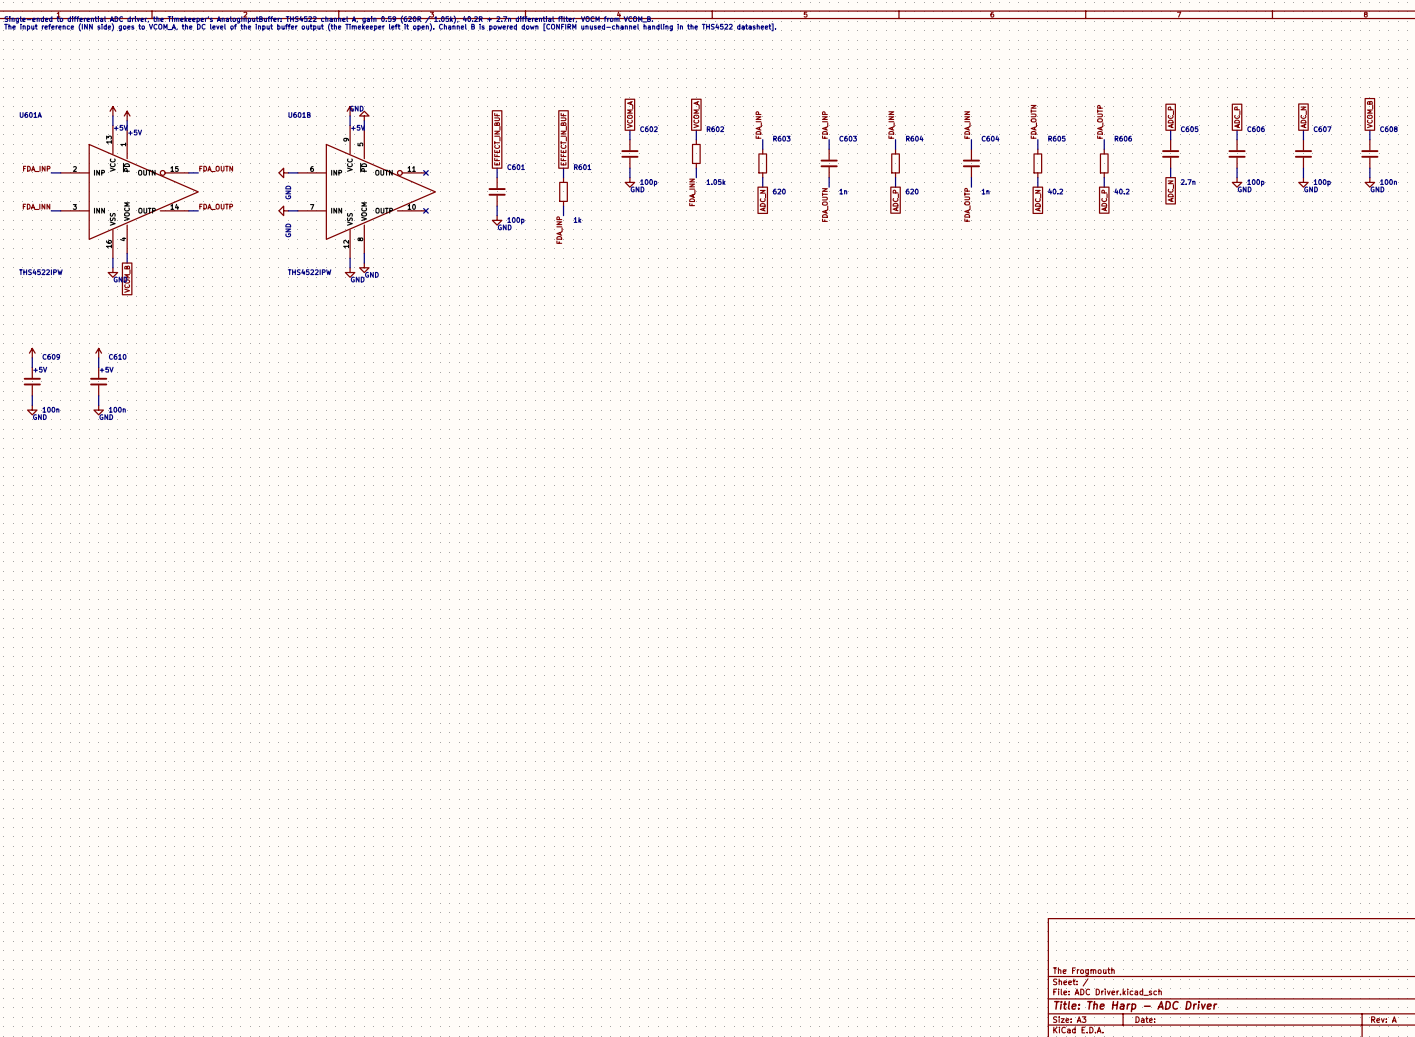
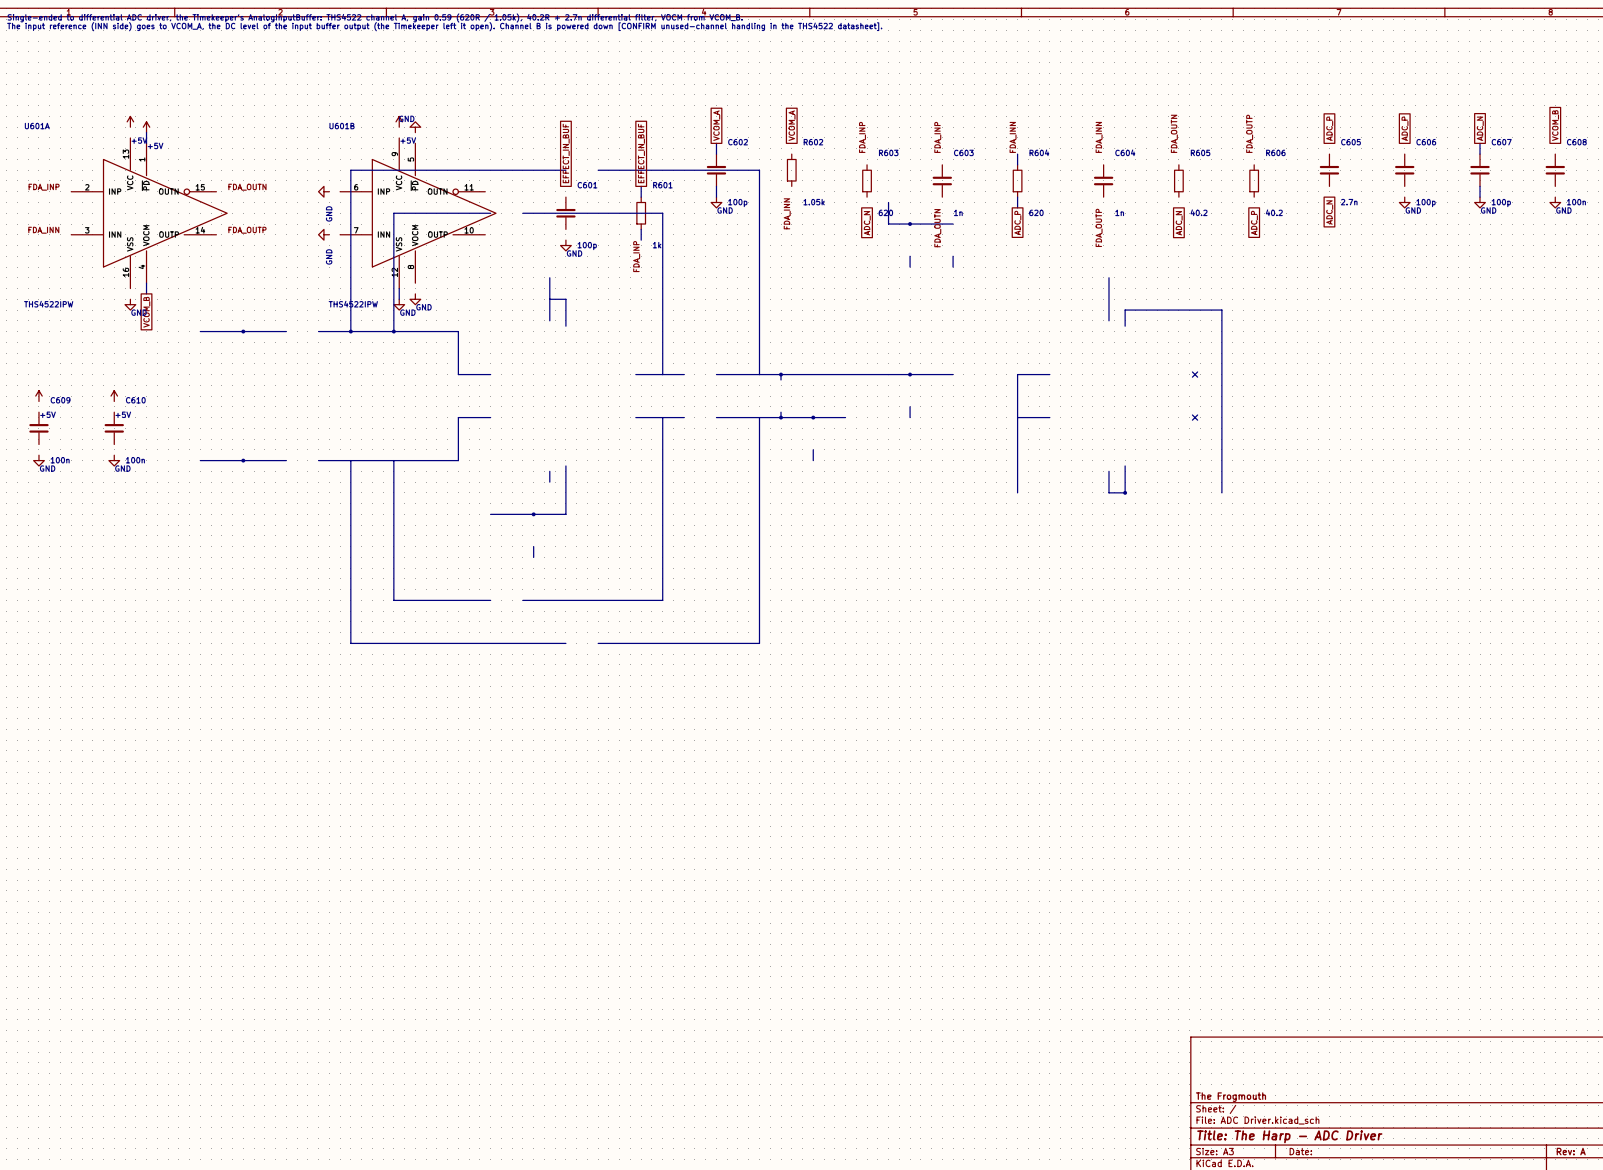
wire: (112, 116) (112, 125) -> none
wire: (350, 116) (350, 125) -> none
wire: (364, 120) (364, 130) -> none
wire: (696, 130) (696, 139) -> none
wire: (1170, 130) (1170, 139) -> none
wire: (1237, 130) (1237, 139) -> none
wire: (1369, 130) (1369, 139) -> none
wire: (762, 139) (762, 149) -> none
wire: (829, 139) (829, 149) -> none
wire: (971, 139) (971, 149) -> none
wire: (1037, 139) (1037, 149) -> none
wire: (1104, 139) (1104, 149) -> none
wire: none -> (565, 170) (350, 170) (350, 331)
wire: none -> (598, 170) (759, 170) (759, 374)
wire: (497, 168) (497, 177) -> none
wire: (696, 168) (696, 177) -> none
wire: (1170, 168) (1170, 177) -> none
wire: (1237, 168) (1237, 177) -> none
wire: (1369, 168) (1369, 177) -> none
wire: (51, 172) (60, 172) -> none
wire: (188, 172) (198, 172) -> none
wire: (288, 172) (297, 172) -> none
no-connect mark: (425, 172) -> none
wire: (762, 177) (762, 187) -> (910, 256) (910, 267)
wire: (829, 177) (829, 187) -> (953, 256) (953, 267)
wire: (971, 177) (971, 187) -> none
wire: (1037, 177) (1037, 187) -> none
wire: (1104, 177) (1104, 187) -> none
wire: none -> (888, 202) (888, 224) (953, 224)
wire: none -> (490, 213) (393, 213) (393, 331)
wire: none -> (522, 213) (662, 213) (662, 374)
junction: none -> (910, 224)
wire: (497, 206) (497, 215) -> none
wire: (51, 210) (60, 210) -> none
wire: (188, 210) (198, 210) -> none
wire: (288, 210) (297, 210) -> none
no-connect mark: (425, 210) -> none
wire: none -> (549, 277) (549, 320)
wire: none -> (1108, 277) (1108, 320)
wire: (364, 253) (364, 263) -> none
wire: (112, 258) (112, 267) -> none
wire: none -> (549, 299) (565, 299) (565, 326)
wire: none -> (1125, 326) (1125, 310) (1221, 310) (1221, 492)
wire: none -> (200, 331) (286, 331)
junction: none -> (243, 331)
wire: none -> (318, 331) (458, 331) (458, 374) (490, 374)
junction: none -> (350, 331)
junction: none -> (393, 331)
wire: none -> (635, 374) (684, 374)
wire: none -> (716, 374) (953, 374)
wire: none -> (781, 374) (781, 379)
junction: none -> (781, 374)
junction: none -> (910, 374)
wire: none -> (1049, 374) (1017, 374) (1017, 492)
no-connect mark: none -> (1195, 374)
wire: (32, 357) (32, 367) -> none
wire: (98, 357) (98, 367) -> none
wire: none -> (910, 406) (910, 417)
wire: none -> (781, 412) (781, 417)
wire: none -> (490, 417) (458, 417) (458, 460) (318, 460)
wire: none -> (635, 417) (684, 417)
wire: none -> (662, 417) (662, 600) (522, 600)
wire: none -> (716, 417) (845, 417)
wire: none -> (759, 417) (759, 643) (598, 643)
junction: none -> (781, 417)
junction: none -> (813, 417)
wire: none -> (1017, 417) (1049, 417)
no-connect mark: none -> (1195, 417)
wire: (32, 395) (32, 405) -> none
wire: (98, 395) (98, 405) -> none
wire: none -> (813, 449) (813, 460)
wire: none -> (200, 460) (286, 460)
junction: none -> (243, 460)
wire: none -> (350, 460) (350, 643) (565, 643)
wire: none -> (393, 460) (393, 600) (490, 600)
wire: none -> (565, 465) (565, 514) (490, 514)
wire: none -> (1125, 465) (1125, 492) (1108, 492) (1108, 471)
wire: none -> (549, 471) (549, 482)
junction: none -> (1125, 492)
junction: none -> (533, 514)
wire: none -> (533, 546) (533, 557)

